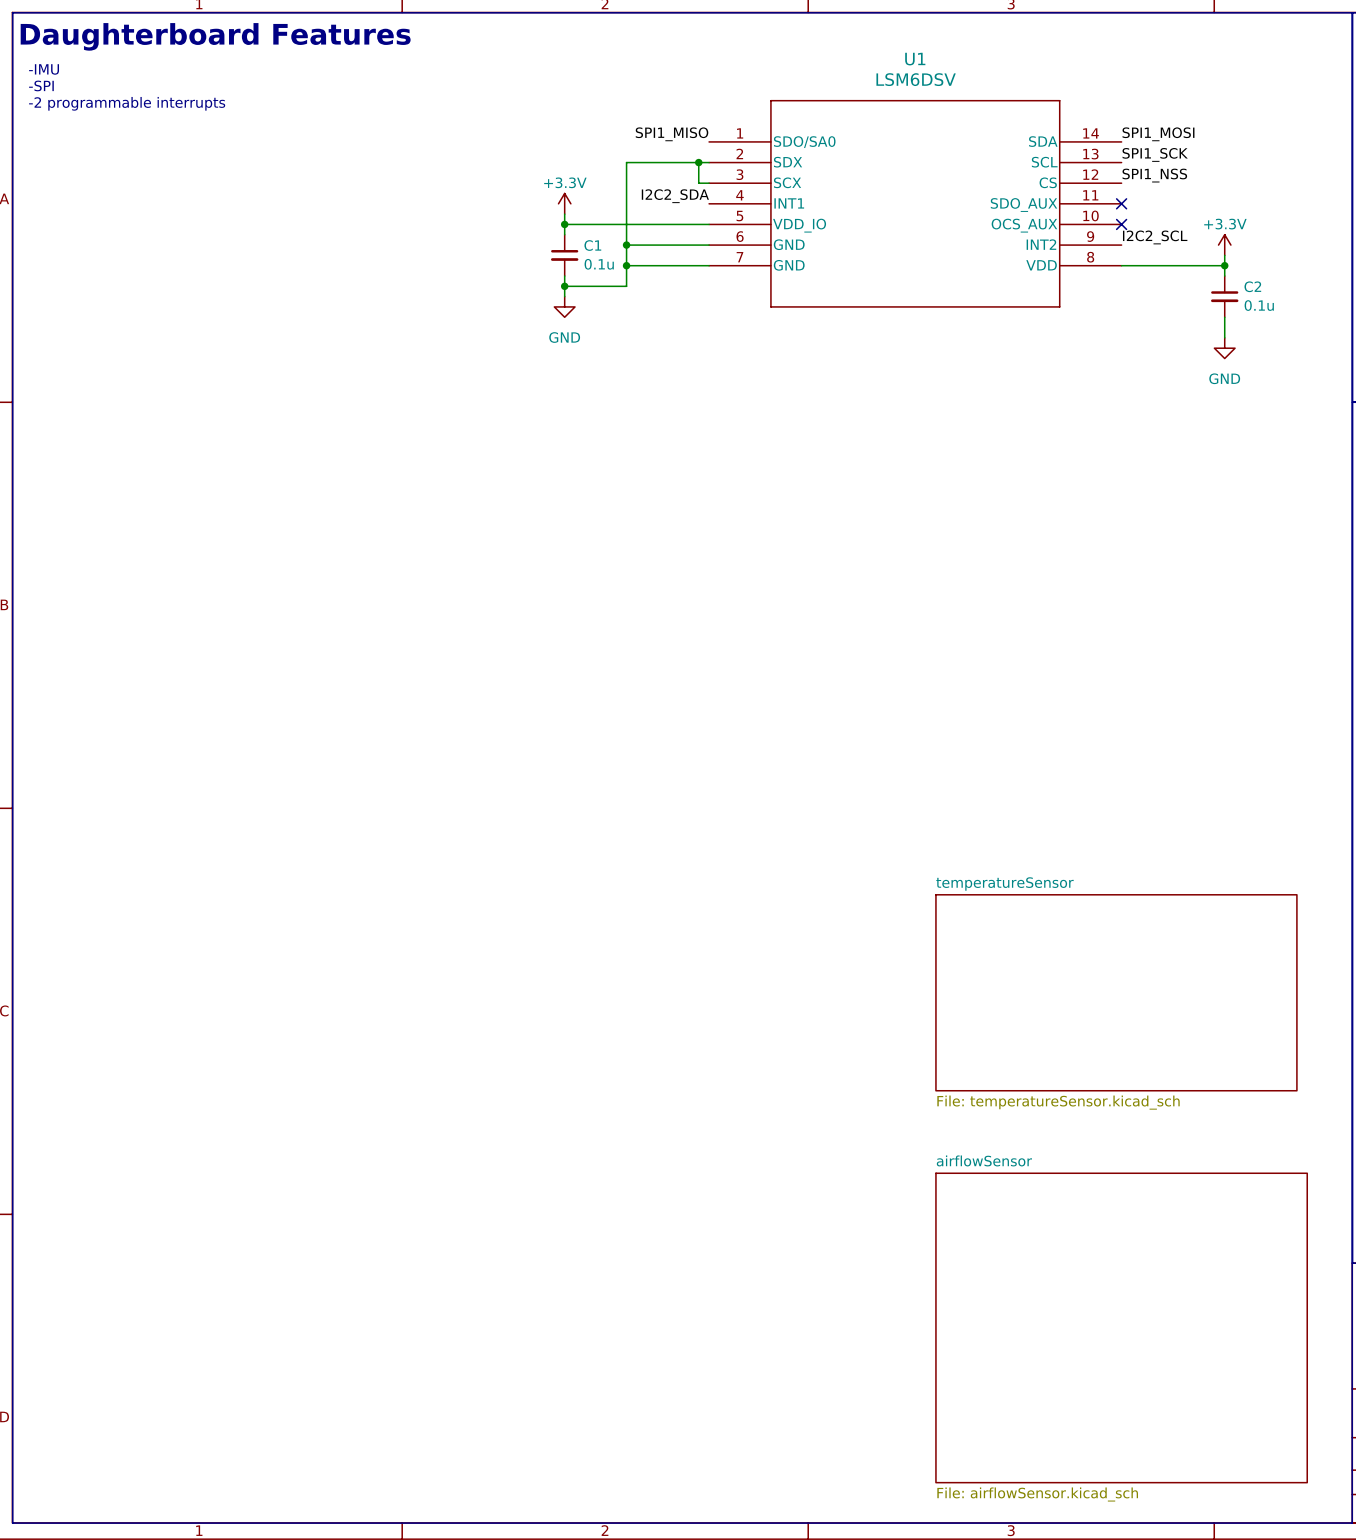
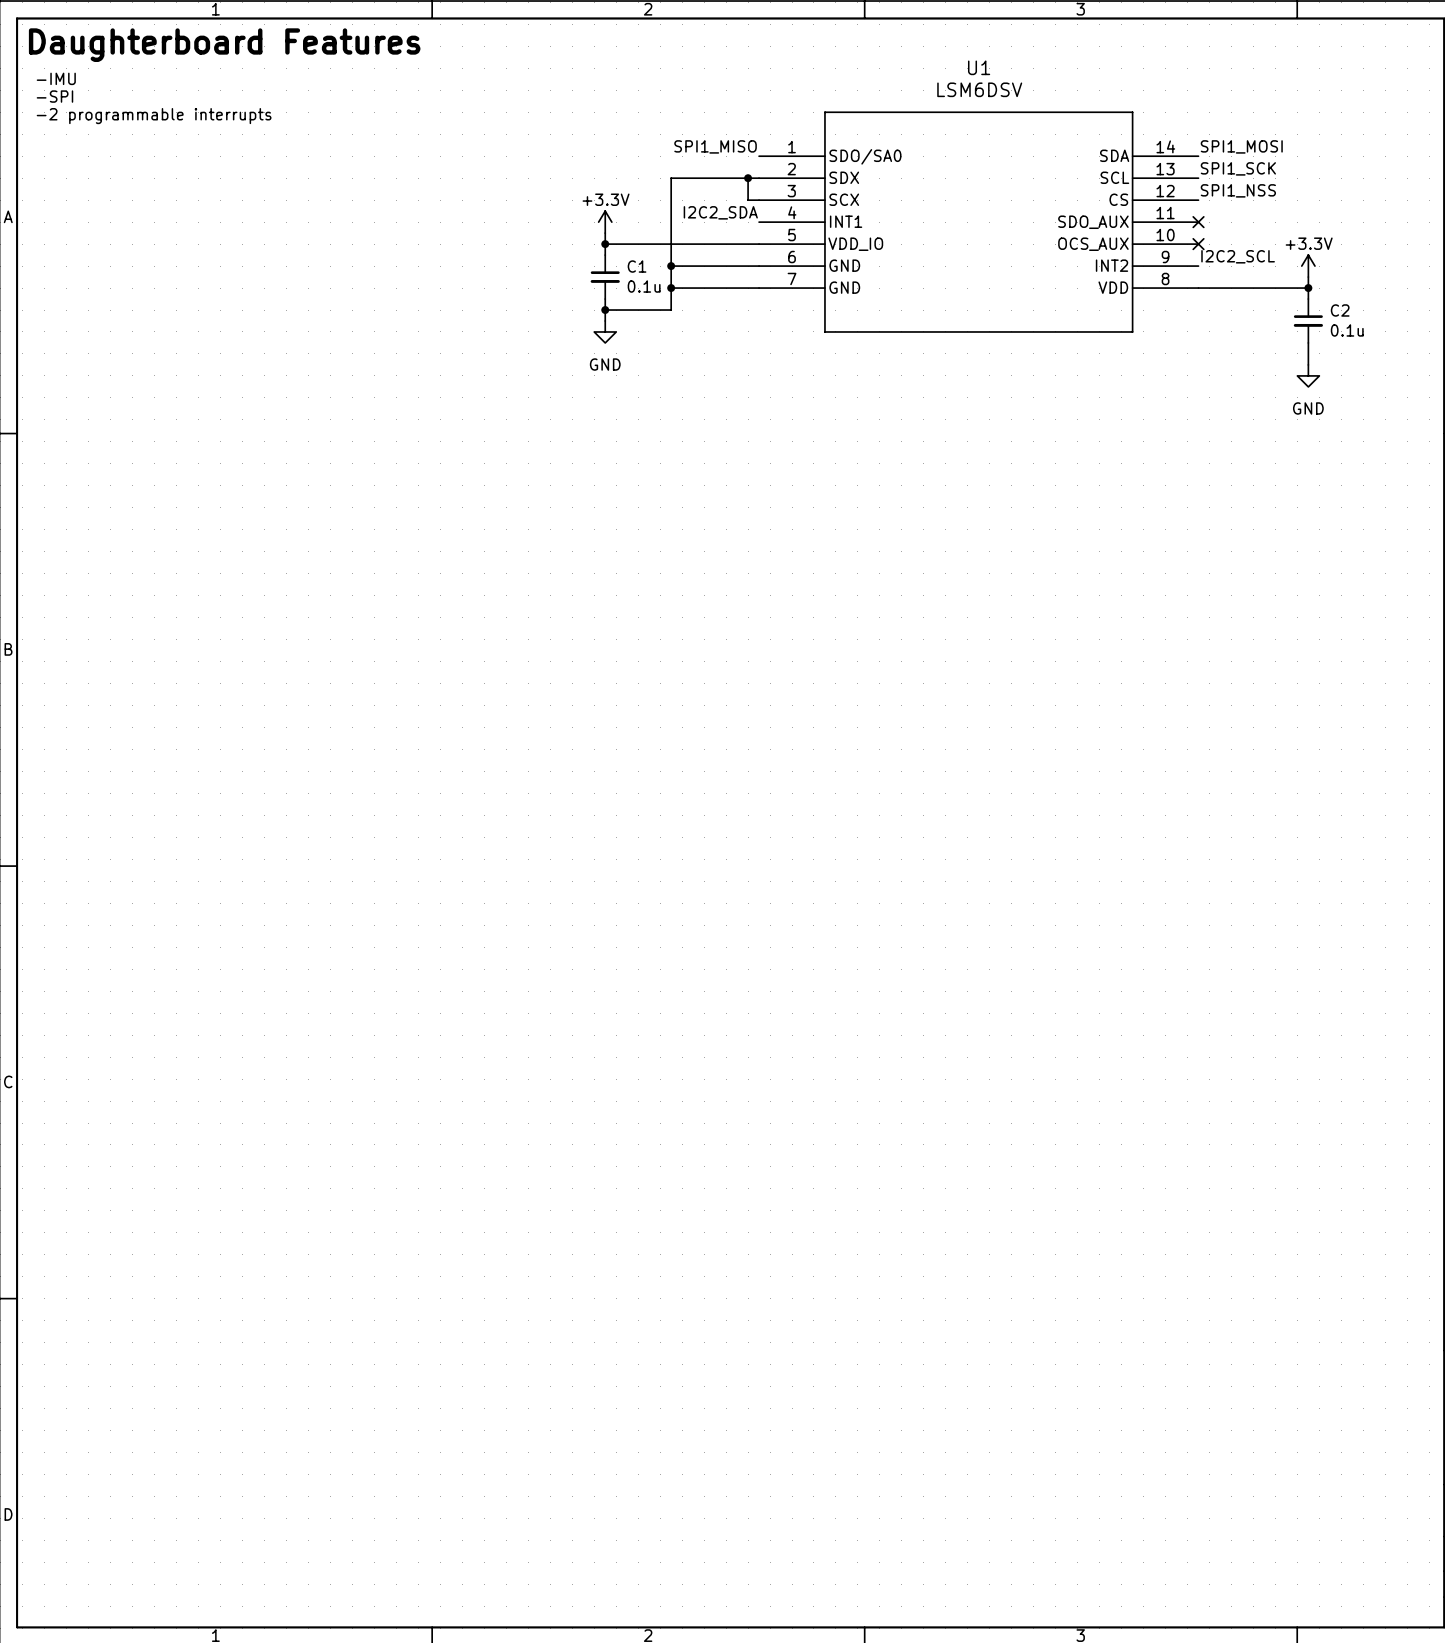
sheet temperatureSensor: File: temperatureSensor.kicad_sch (1116, 992) -> none
sheet airflowSensor: File: airflowSensor.kicad_sch (1121, 1327) -> none

